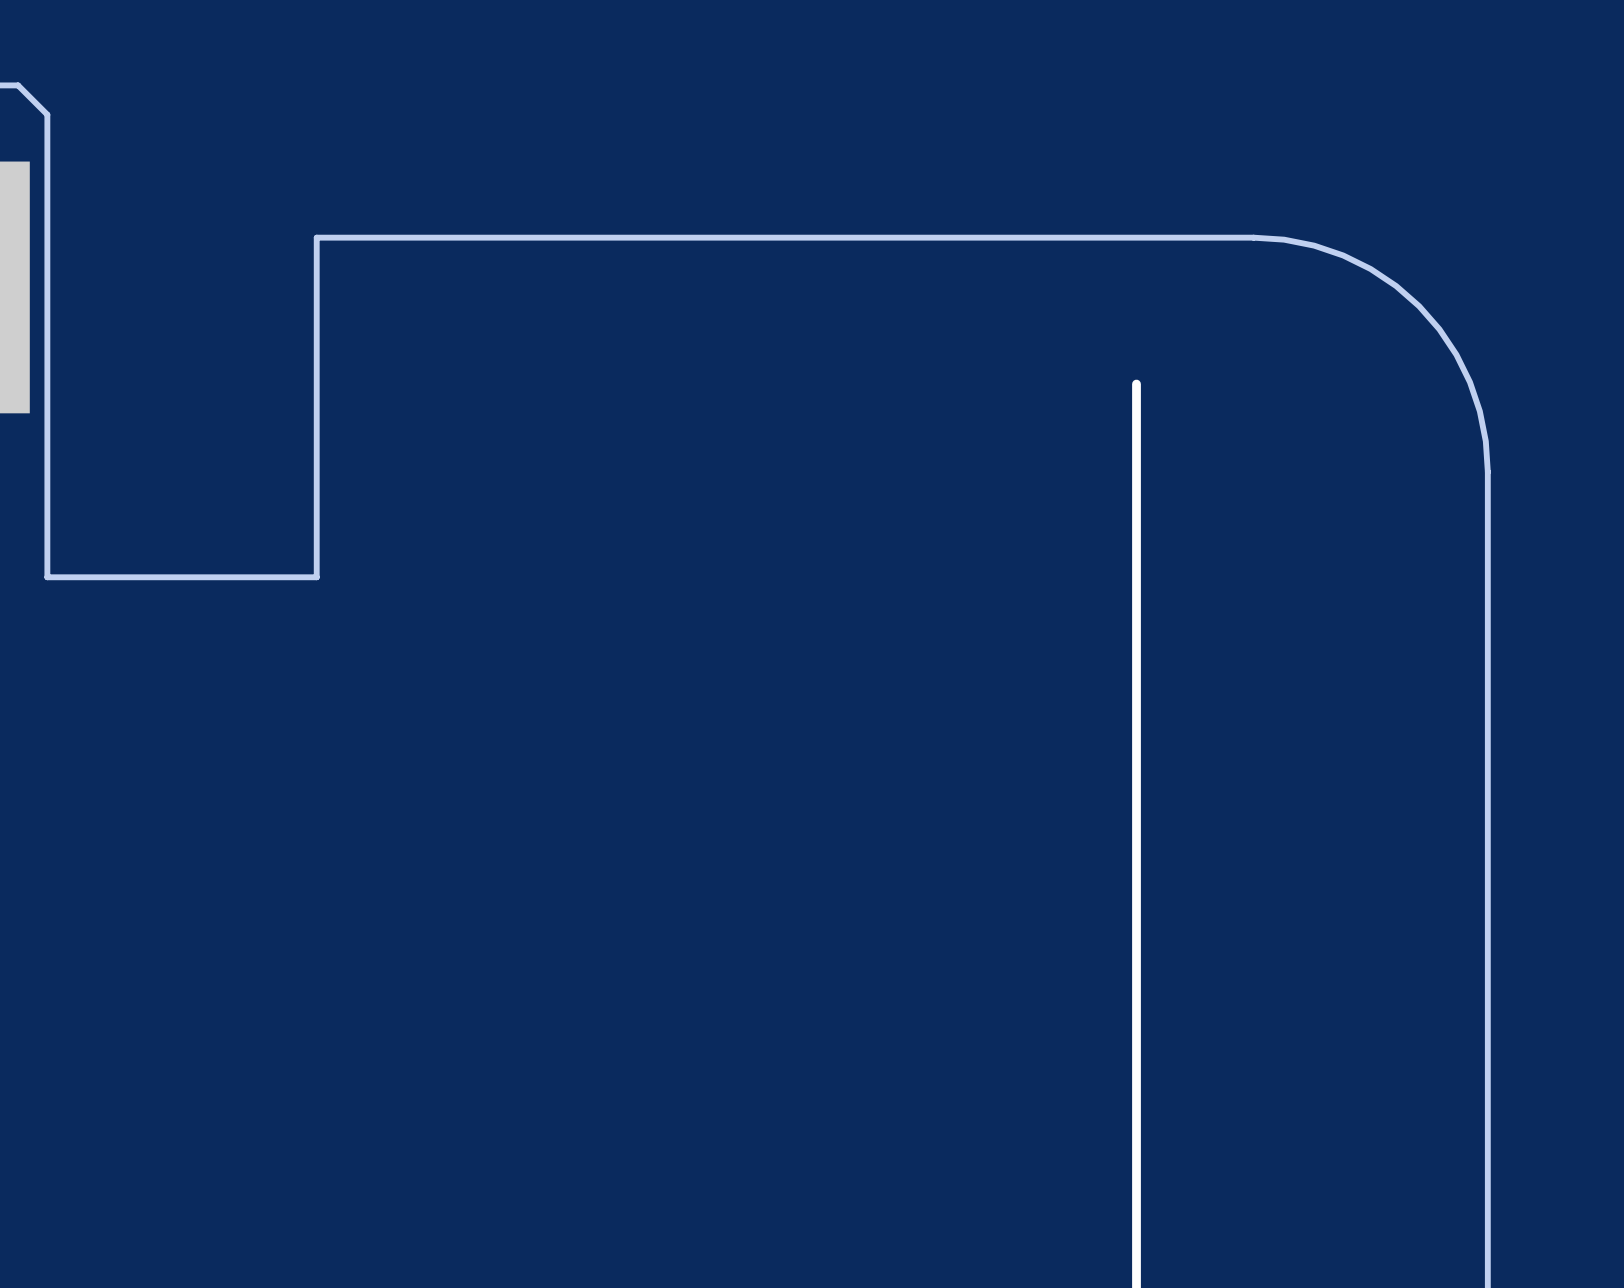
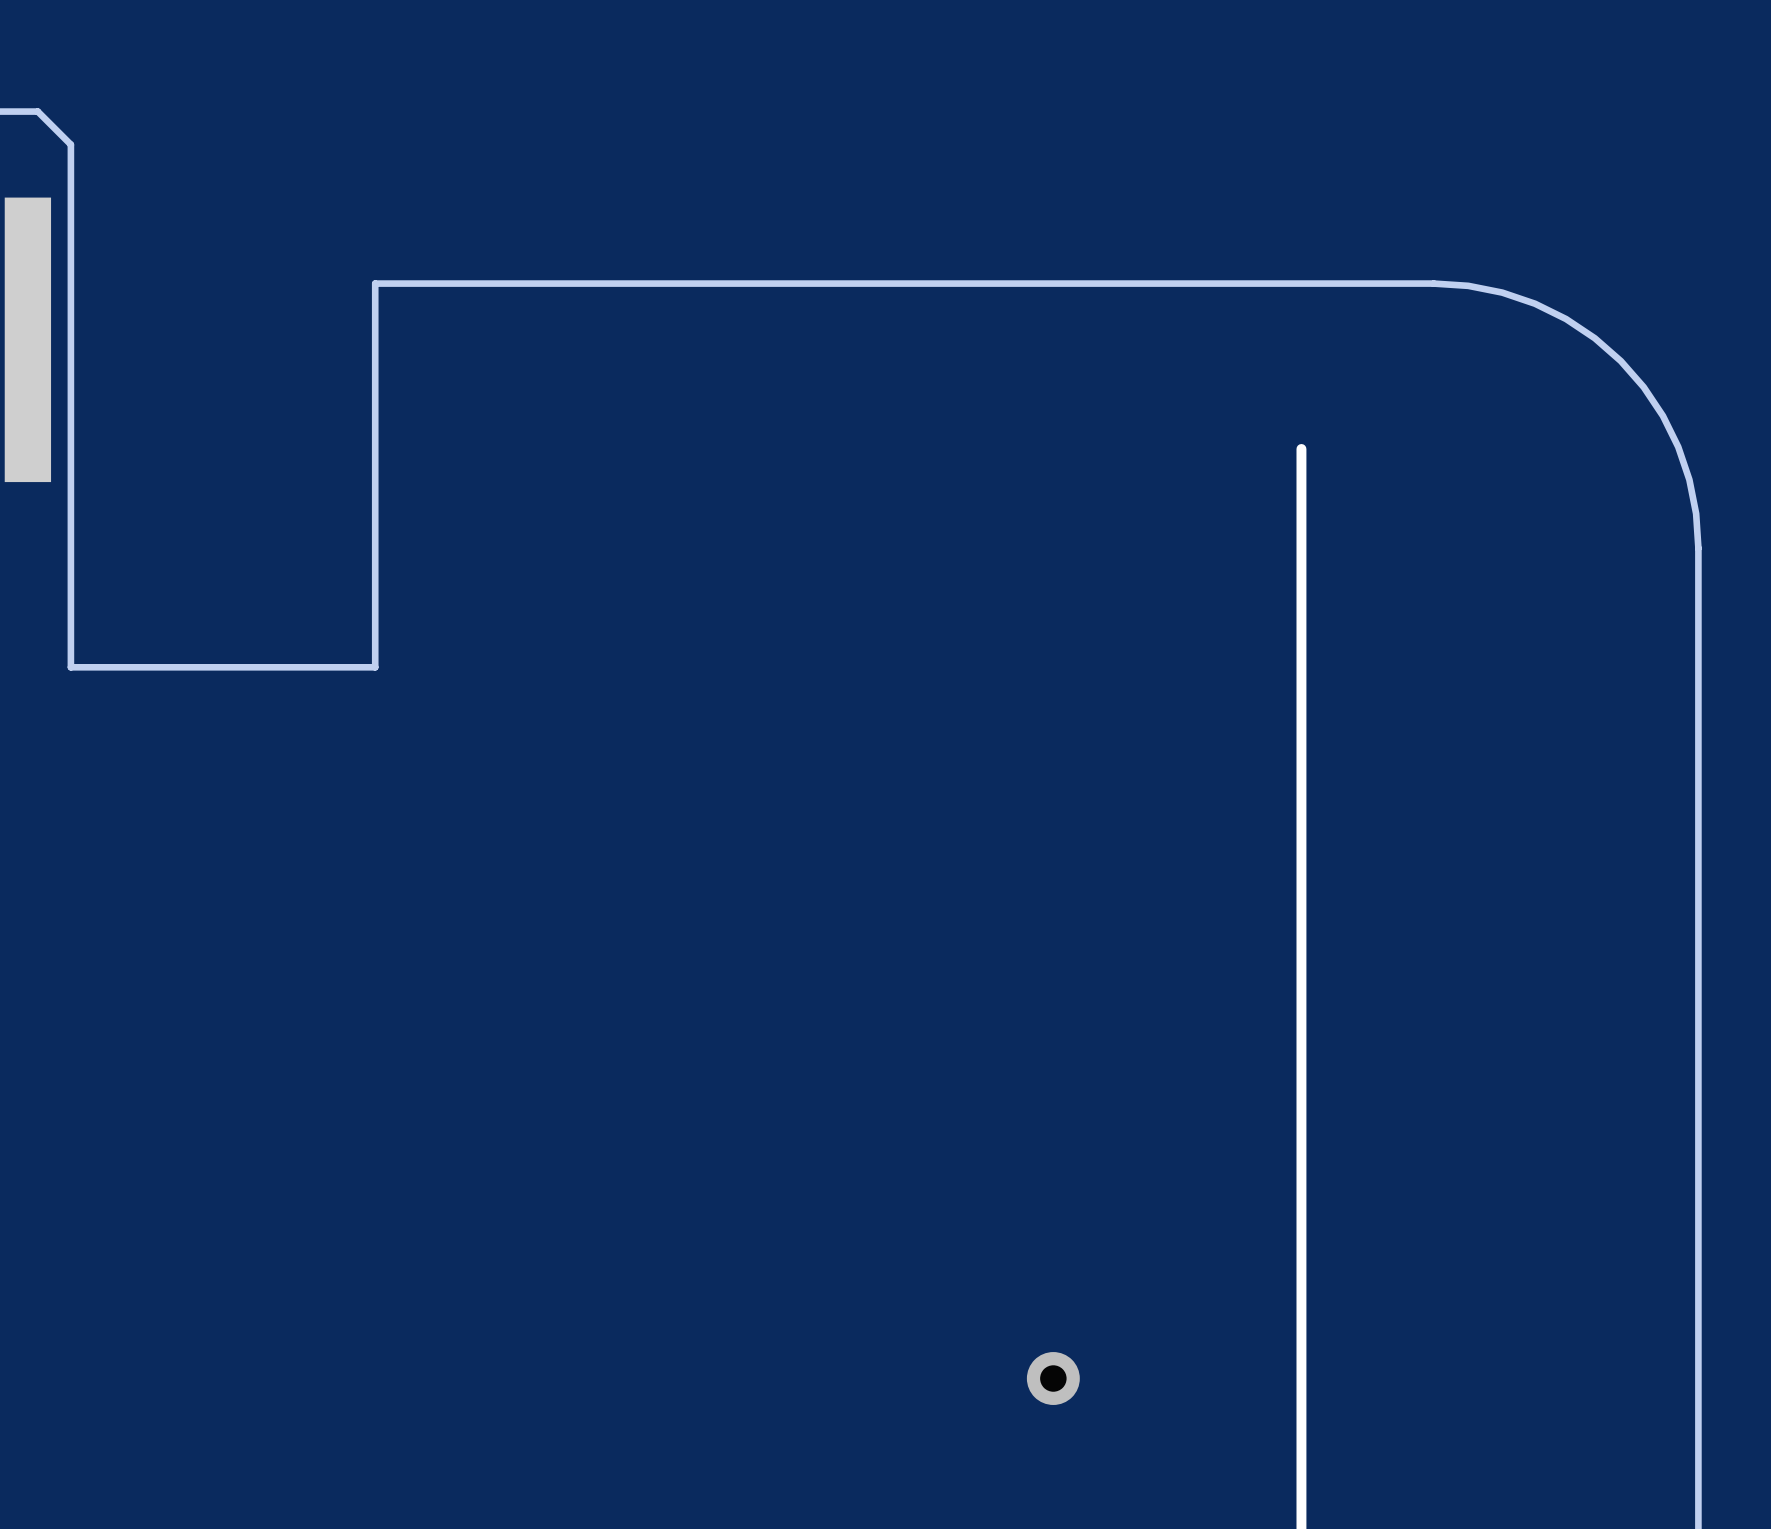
via: none -> (1053, 1378)

